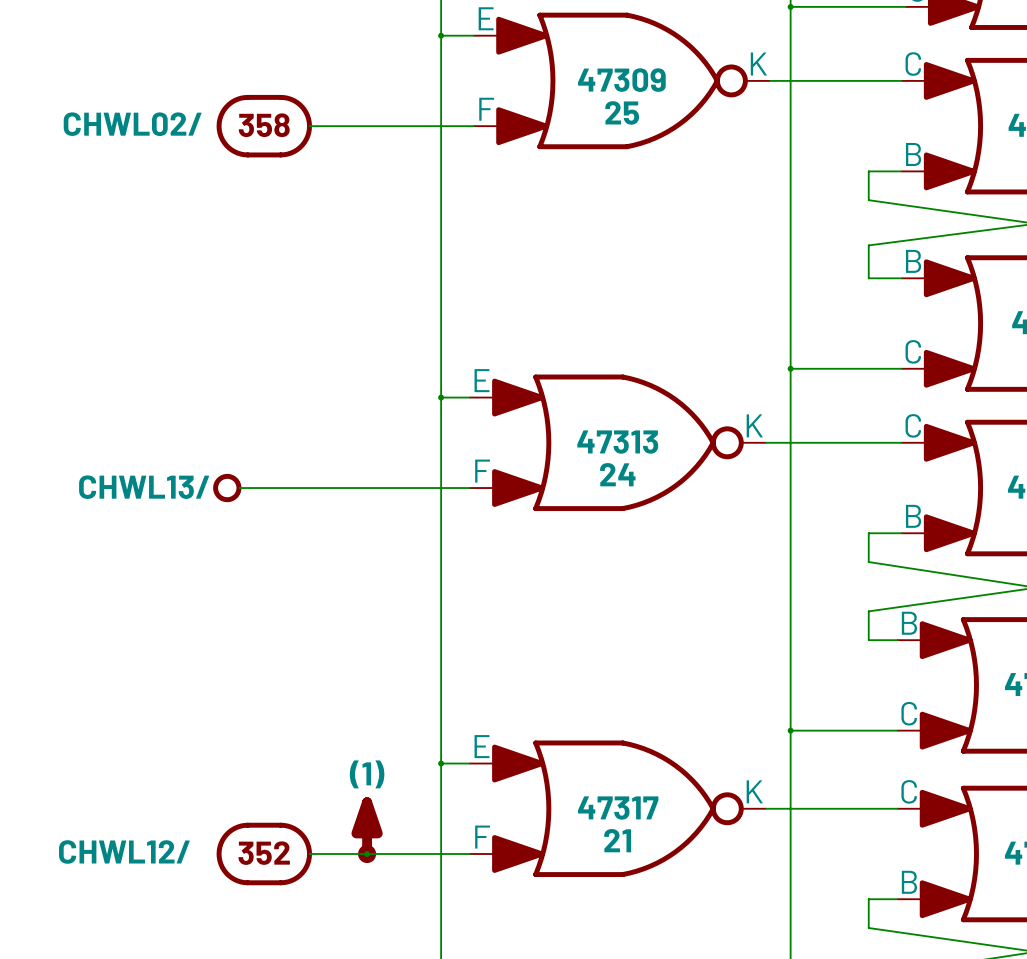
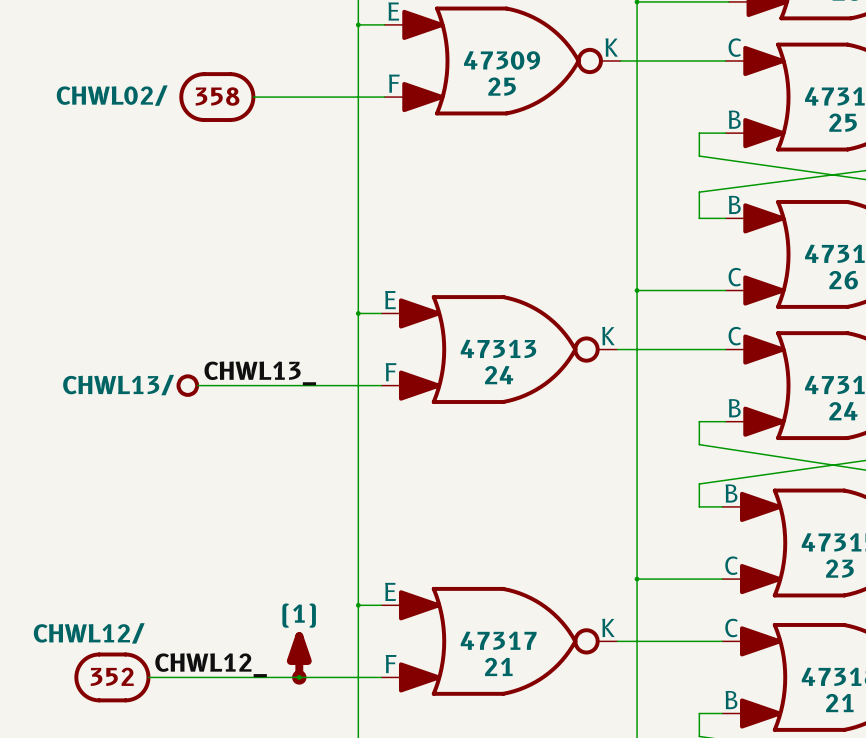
label: none -> CHWL13_ (260, 373)
label: none -> CHWL12_ (211, 665)
part text position: CHWL12/ (124, 852) -> CHWL12/ (89, 633)
wire: none -> (148, 677) (253, 677)
part position: (264, 853) -> (112, 677)

